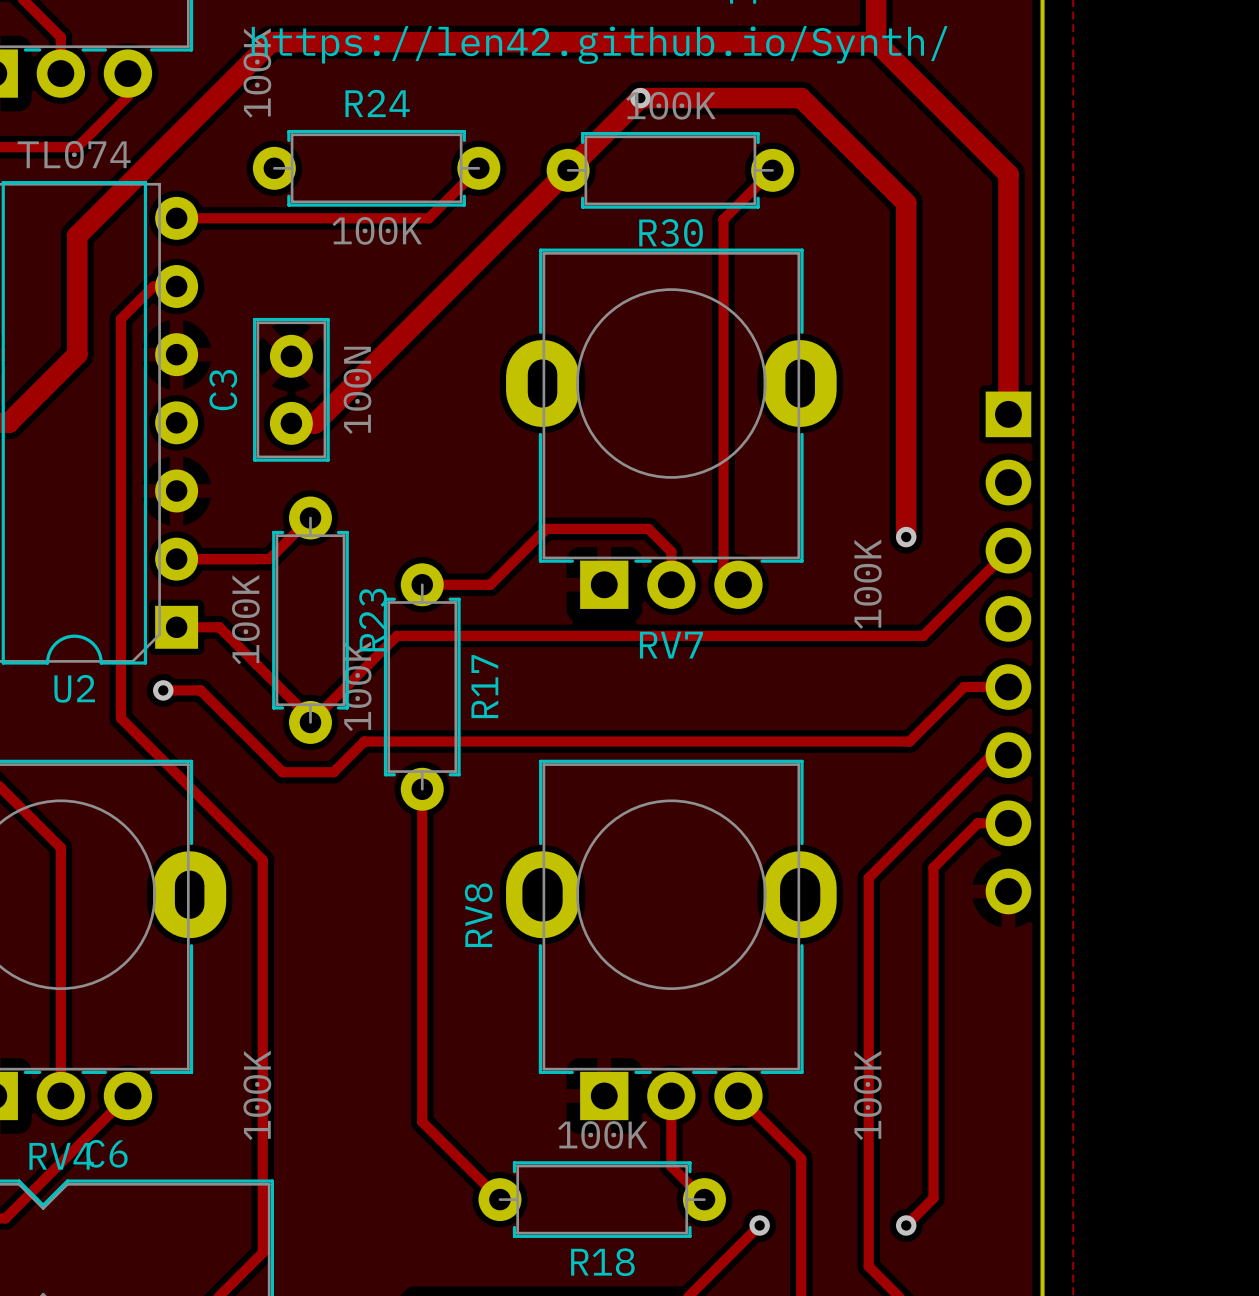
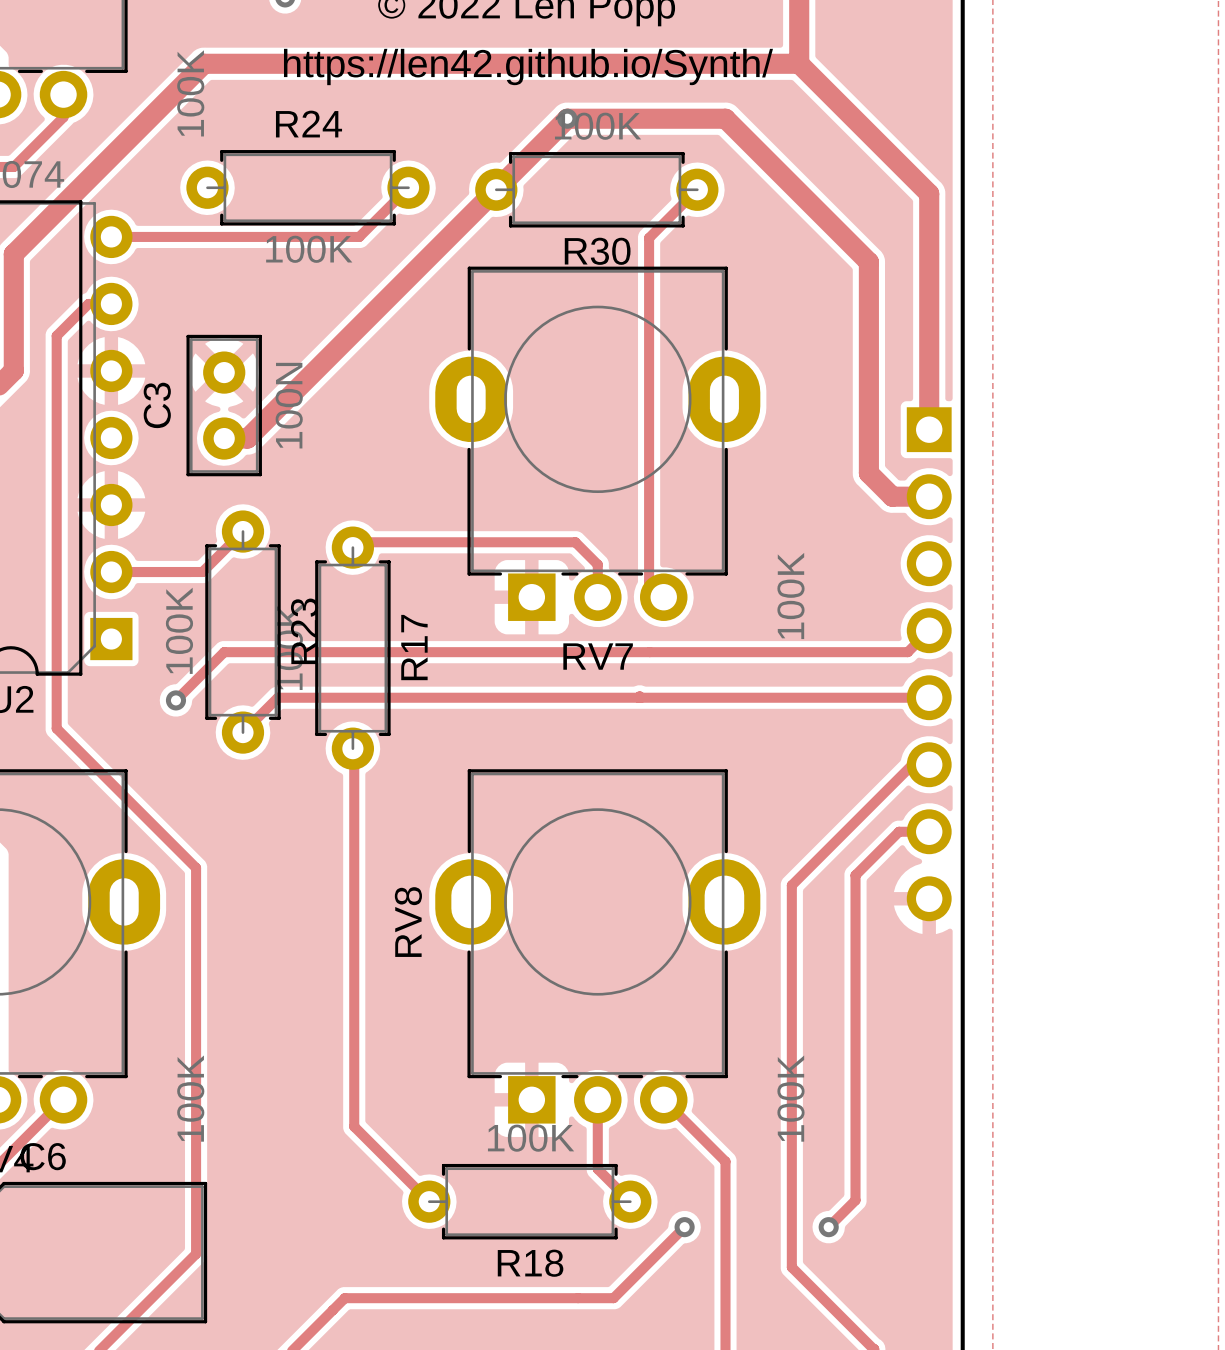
track: (906, 203) (906, 537) -> (828, 221) (868, 262) (868, 473) (892, 496) (929, 496)
track: (546, 528) (490, 584) (422, 584) -> (474, 542) (358, 542) (352, 547)
via: (906, 537) -> none
track: (1008, 550) (923, 635) (397, 635) (345, 687) -> (885, 697) (277, 697)
track: none -> (929, 630) (907, 652) (224, 652) (175, 700)
track: (176, 627) (219, 627) (310, 718) (310, 722) -> none
R17 position: (422, 687) -> (352, 648)
track: (964, 687) (909, 741) (364, 741) (333, 772) (282, 772) (200, 690) (163, 690) -> none
via position: (163, 690) -> (175, 700)
track: (422, 789) (423, 1123) -> (352, 748) (354, 1126)

